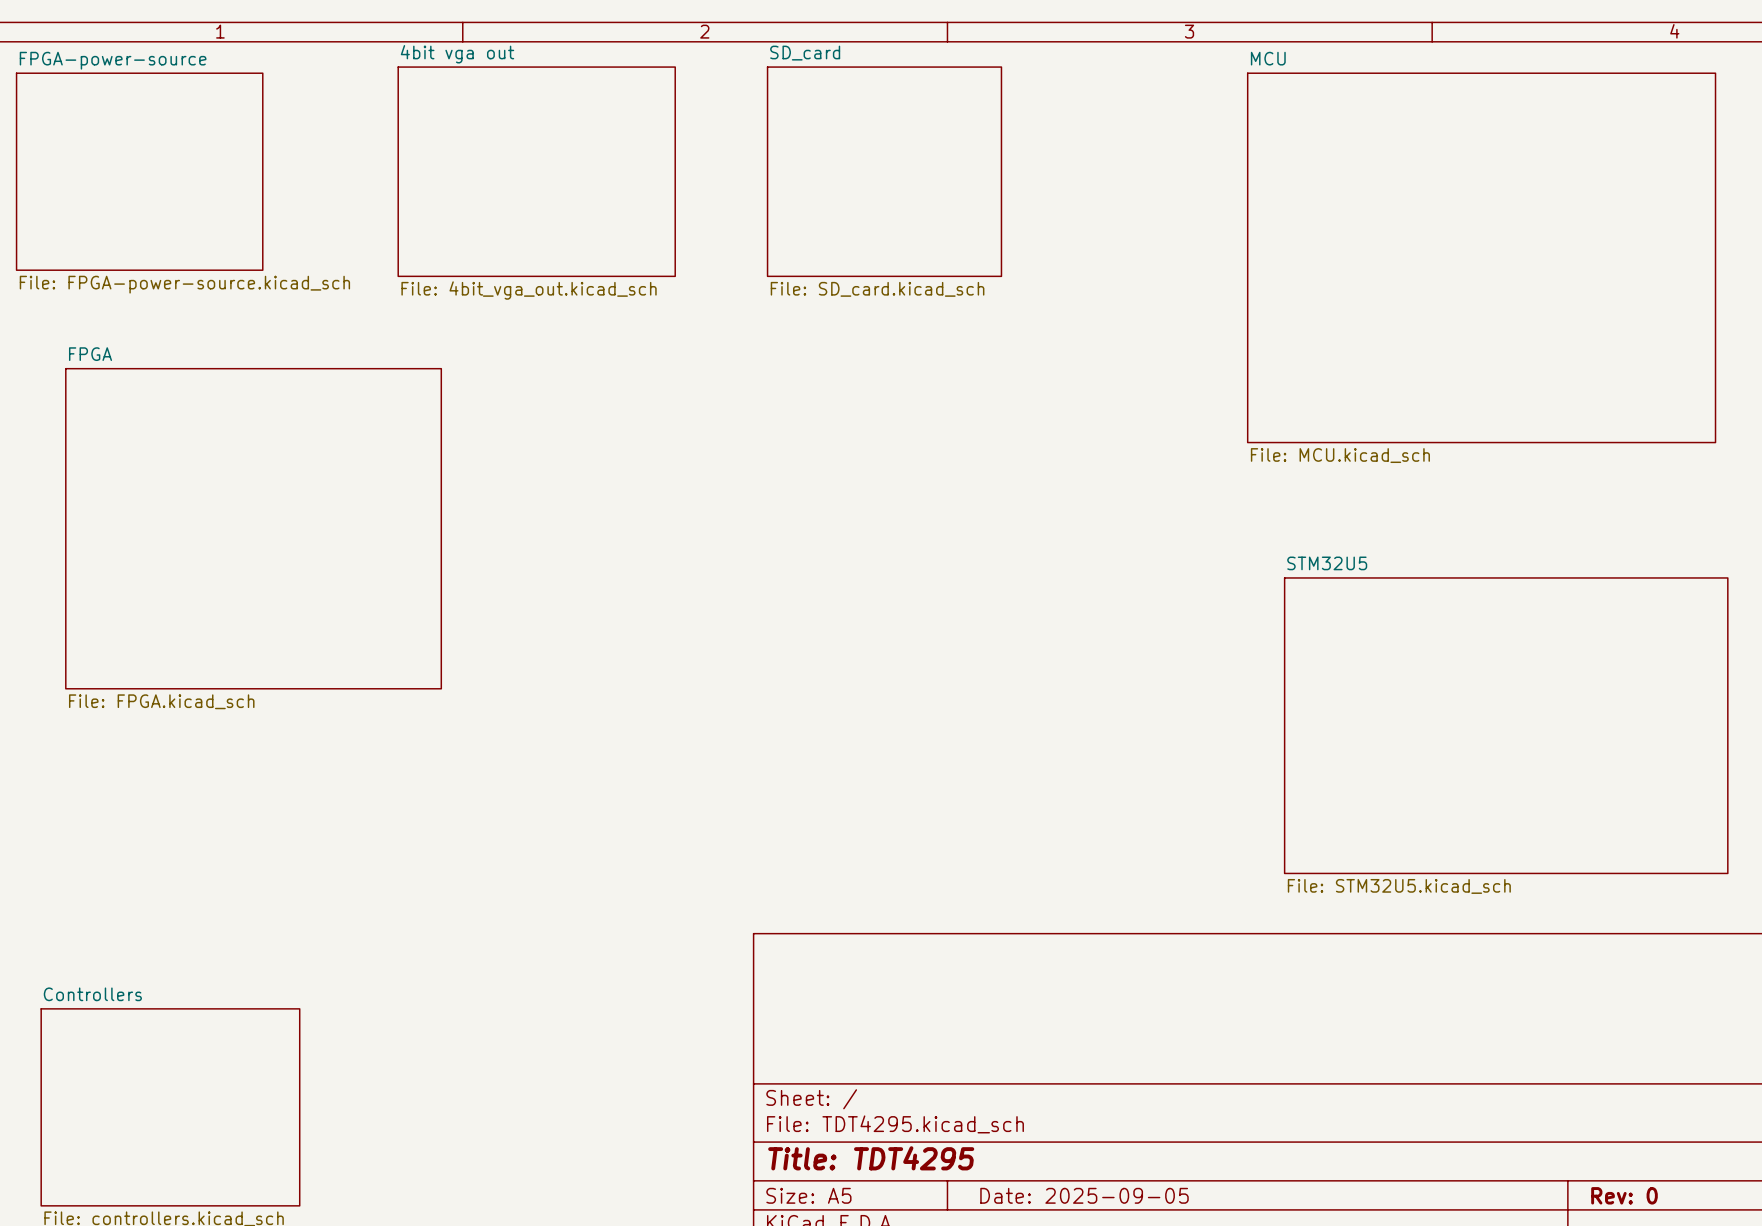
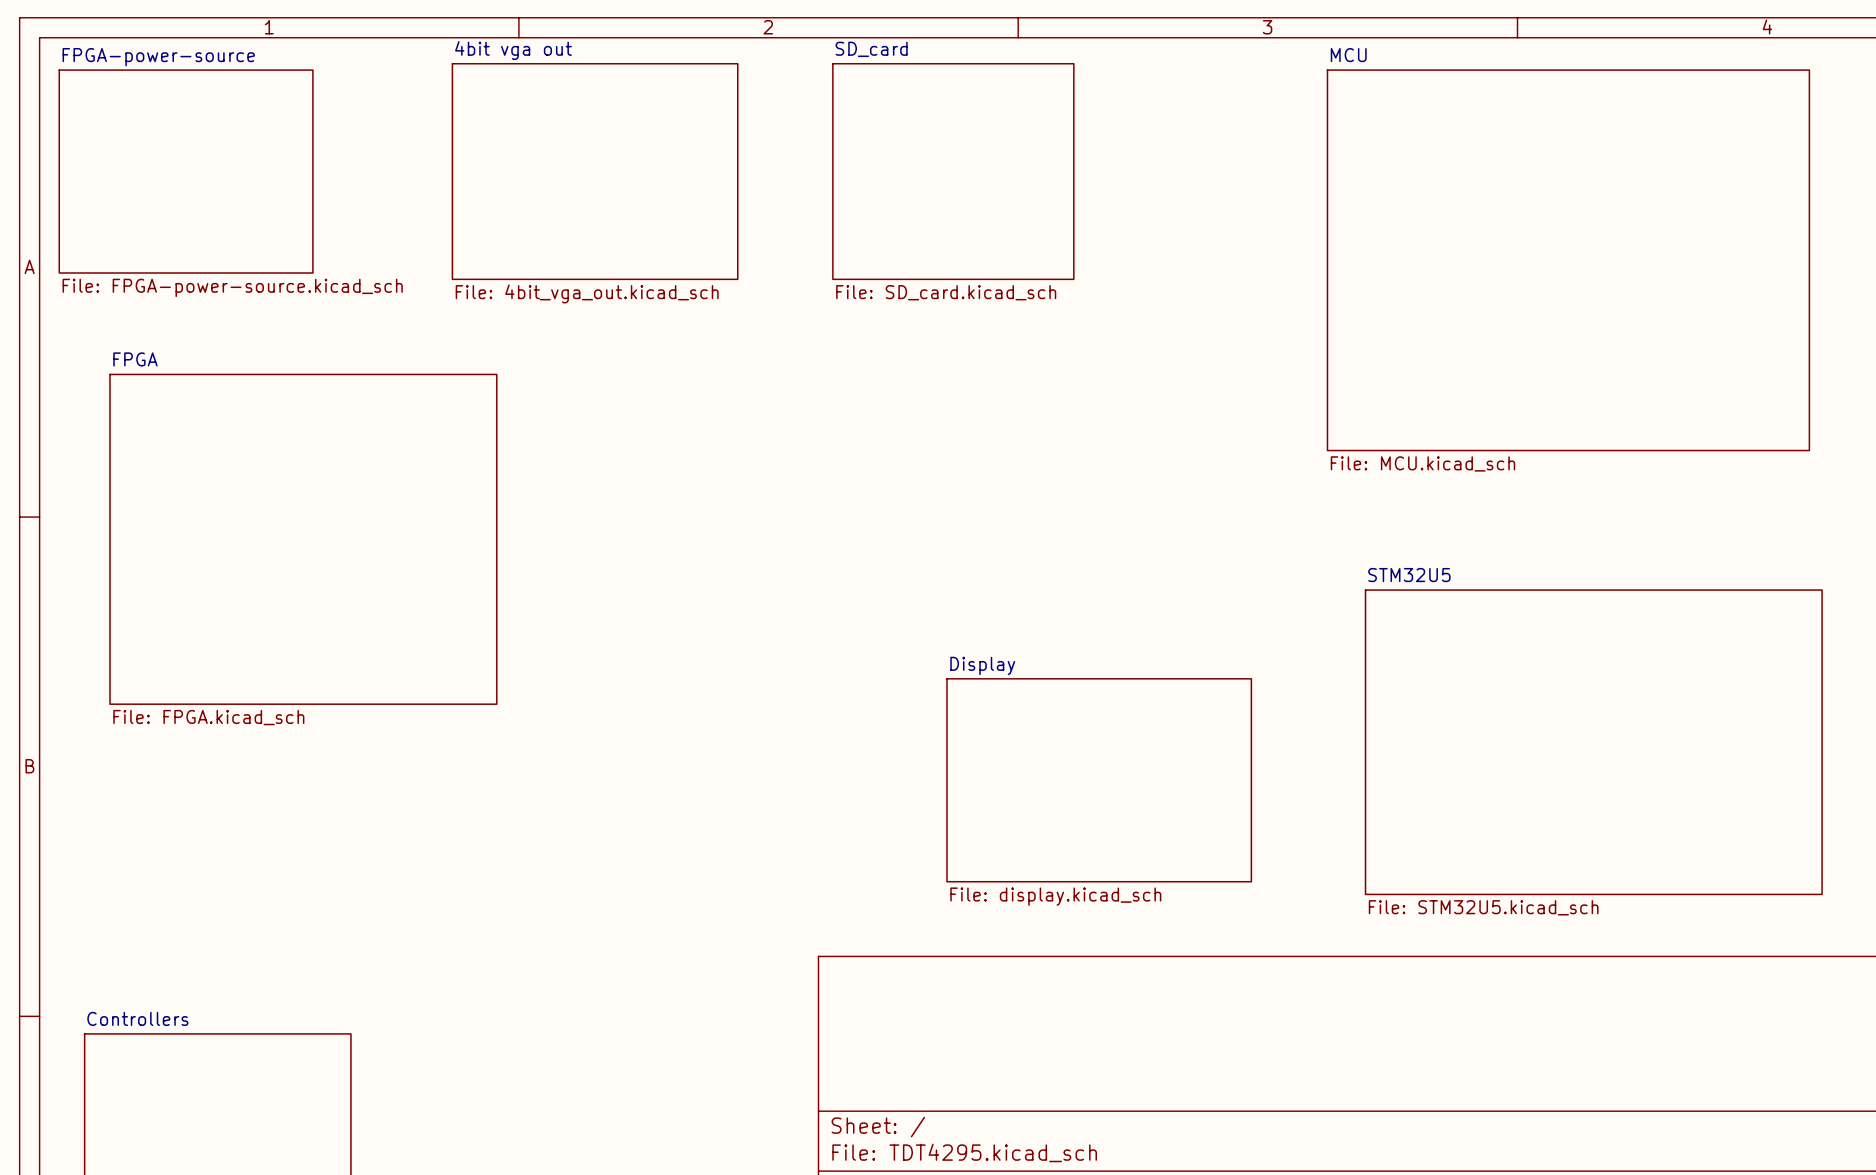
sheet Display: none -> File: display.kicad_sch (1099, 780)

